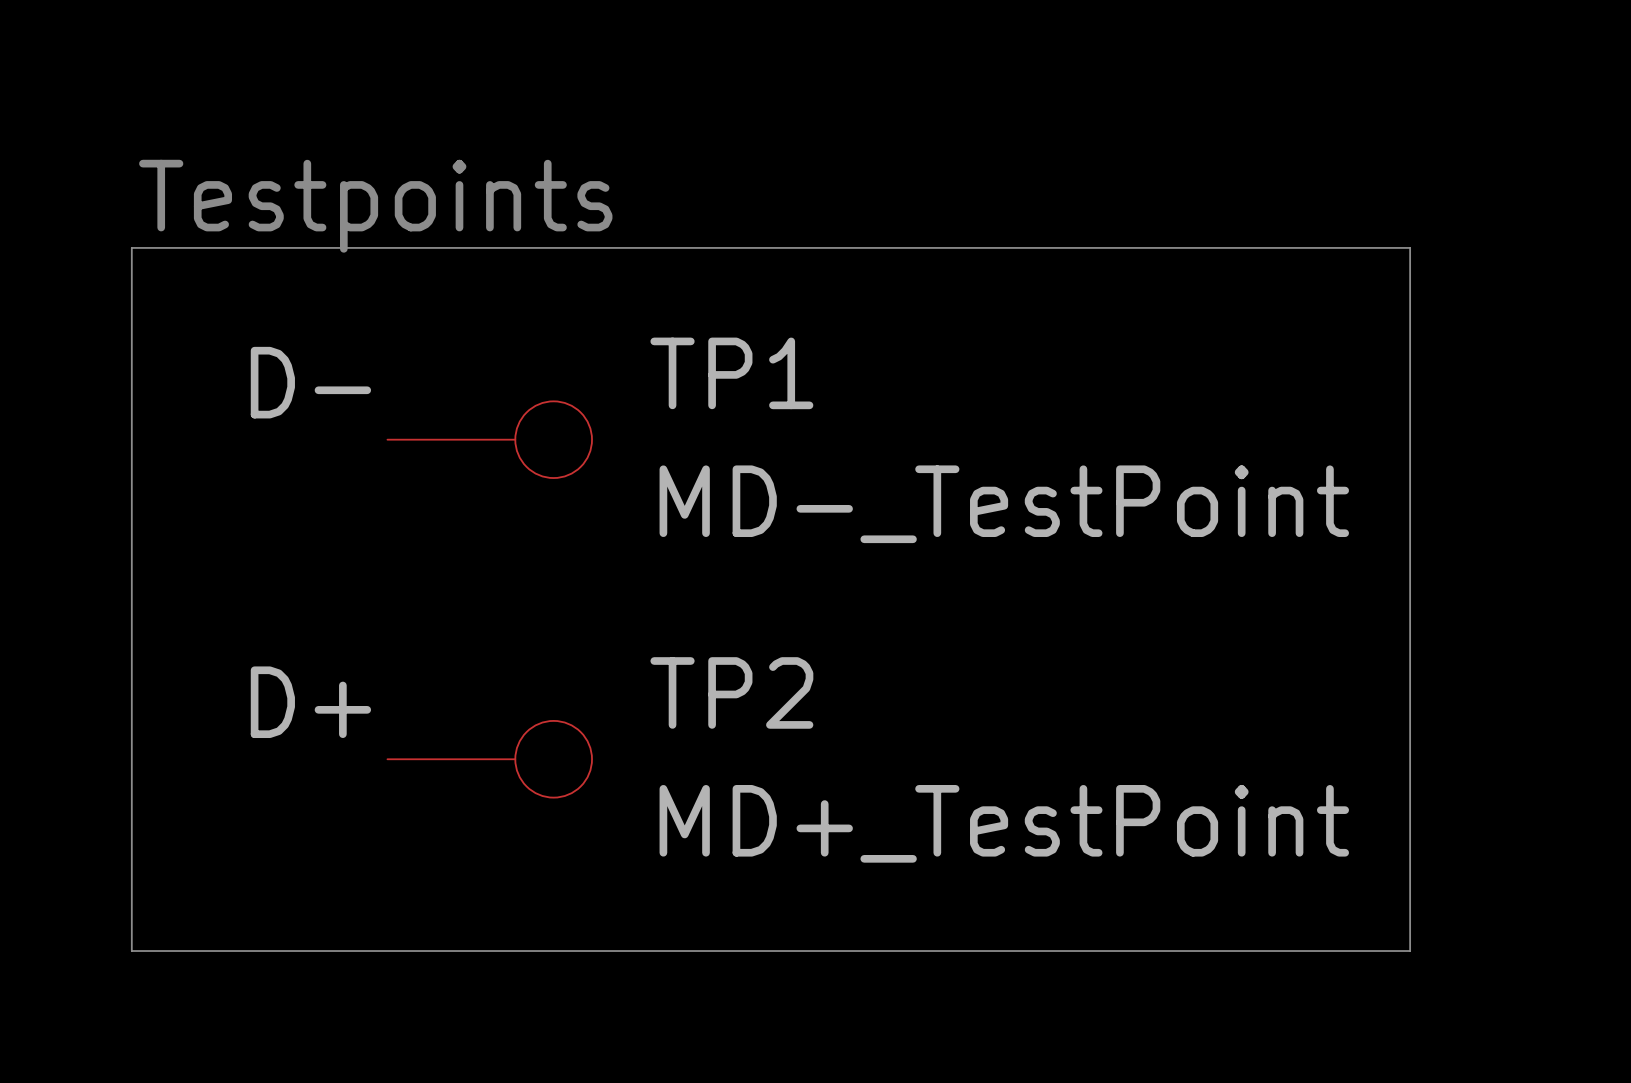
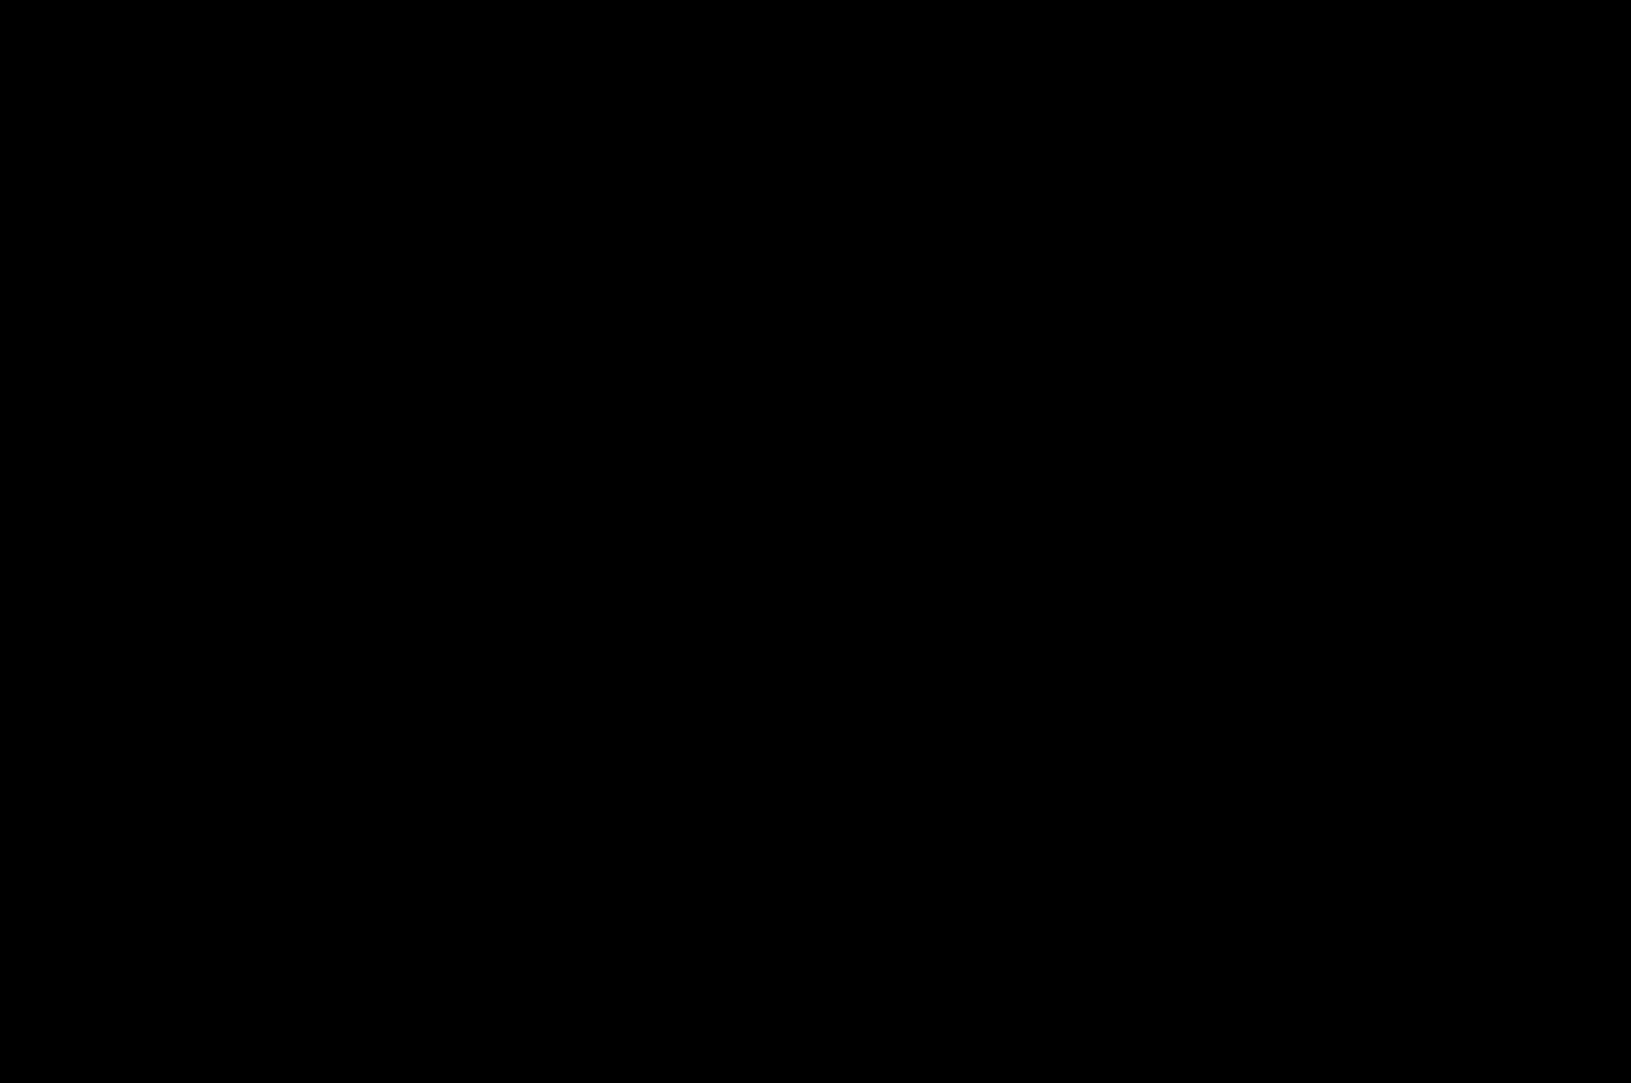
text: Testpoints (375, 206) -> none
line: (131, 247) (131, 951) (1410, 951) (1410, 247) (131, 247) -> none
label: D- (310, 382) -> none
TP1: MD-_TestPoint (489, 439) -> none
label: D+ (310, 702) -> none
TP2: MD+_TestPoint (489, 759) -> none

